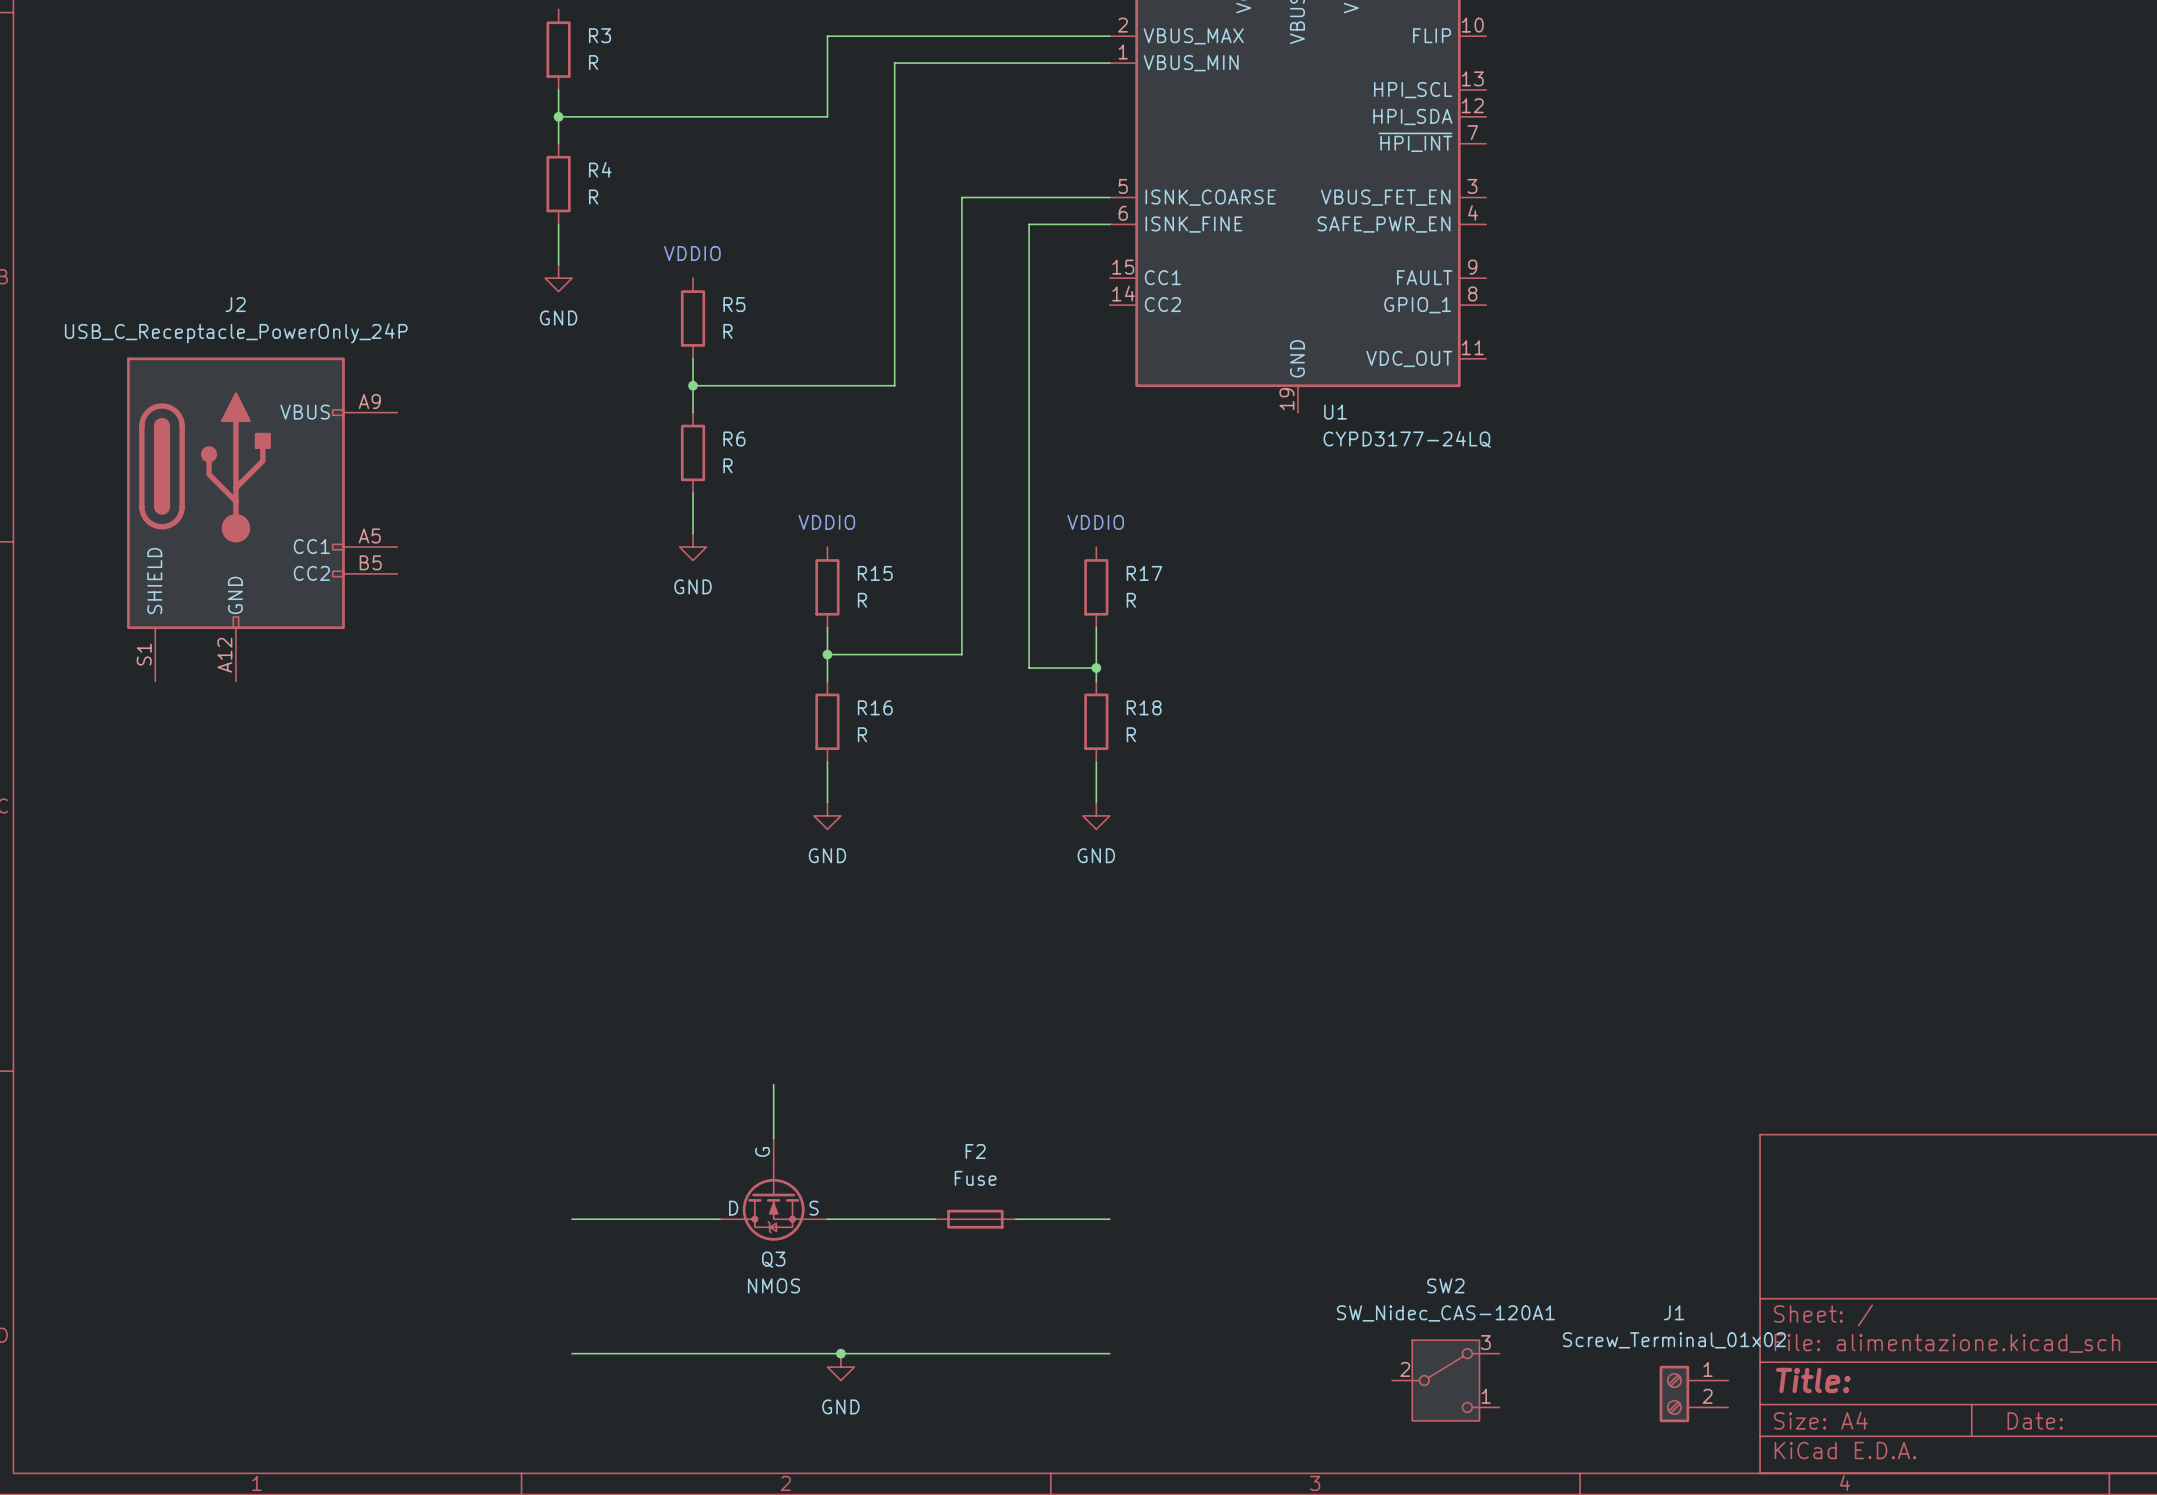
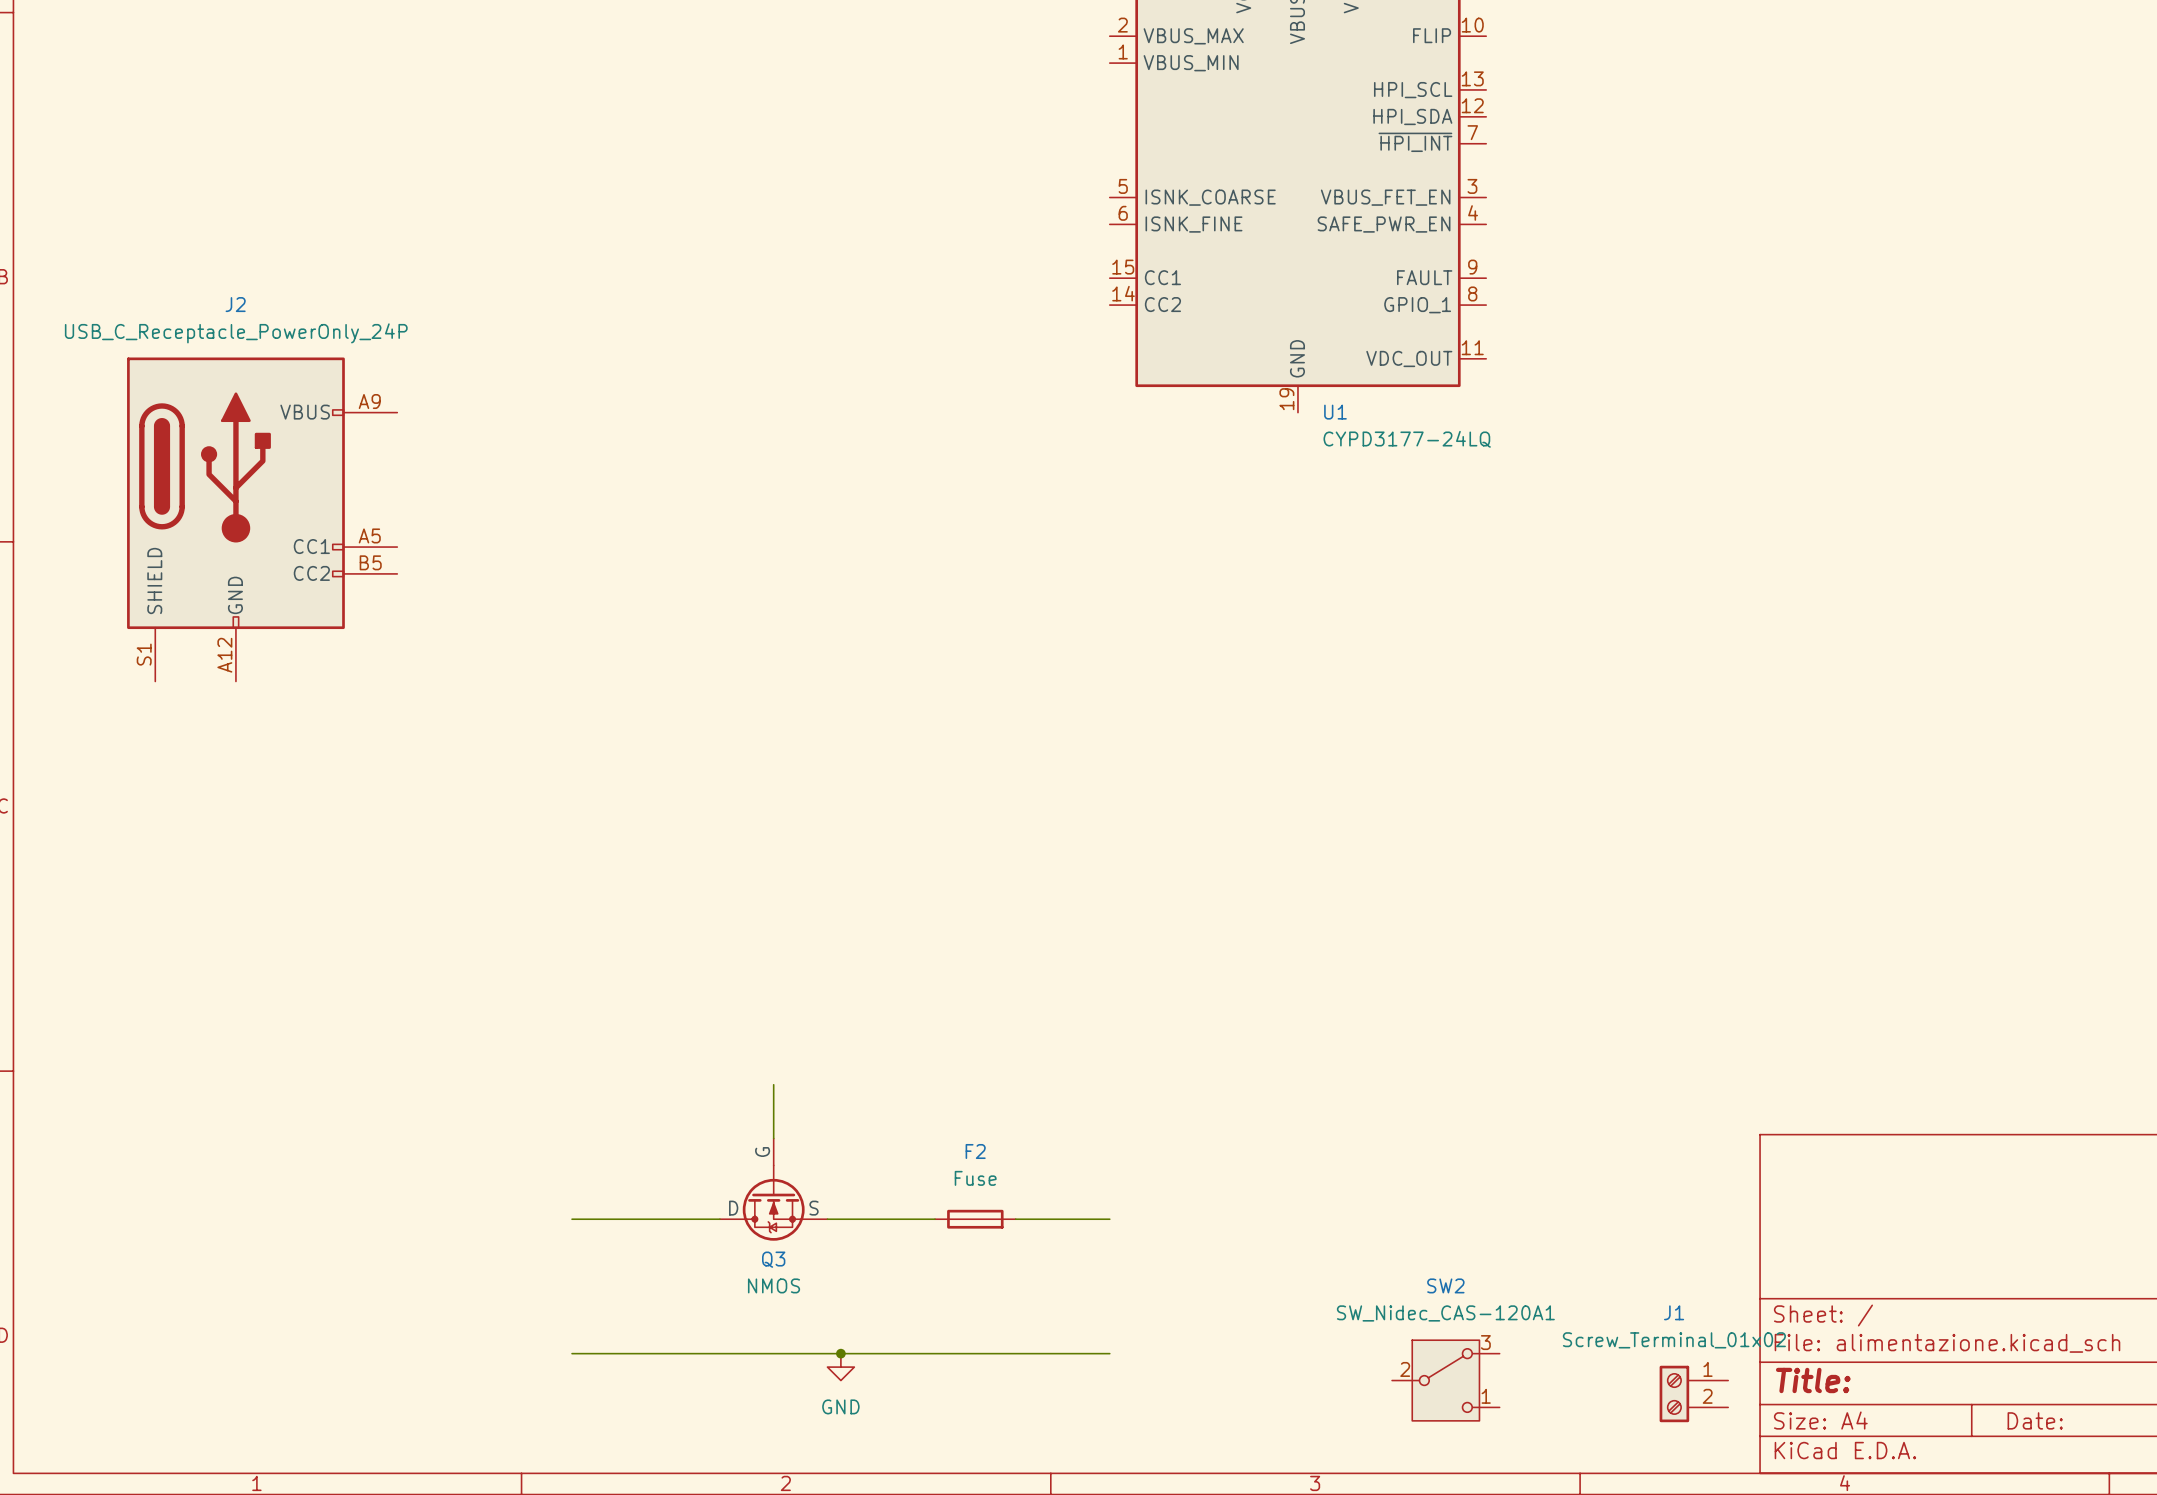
wire: (1109, 36) (827, 36) (827, 116) (558, 116) -> none
R3: R (558, 49) -> none
wire: (1109, 63) (894, 63) (894, 385) (693, 385) -> none
wire: (558, 89) (558, 143) -> none
junction: (558, 116) -> none
R4: R (558, 184) -> none
wire: (1109, 197) (961, 197) (961, 654) (827, 654) -> none
wire: (558, 224) (558, 264) -> none
wire: (1109, 224) (1029, 224) (1029, 668) (1096, 668) -> none
text: VDDIO (692, 253) -> none
power symbol: GND (558, 278) -> none
R5: R (693, 318) -> none
wire: (693, 358) (693, 412) -> none
junction: (693, 385) -> none
R6: R (693, 452) -> none
wire: (693, 493) (693, 533) -> none
text: VDDIO (826, 522) -> none
text: VDDIO (1095, 522) -> none
power symbol: GND (693, 547) -> none
R15: R (827, 587) -> none
R17: R (1096, 587) -> none
wire: (827, 627) (827, 681) -> none
wire: (1096, 627) (1096, 681) -> none
junction: (827, 654) -> none
junction: (1096, 668) -> none
R16: R (827, 721) -> none
R18: R (1096, 721) -> none
wire: (827, 762) (827, 802) -> none
wire: (1096, 762) (1096, 802) -> none
power symbol: GND (827, 815) -> none
power symbol: GND (1096, 815) -> none

